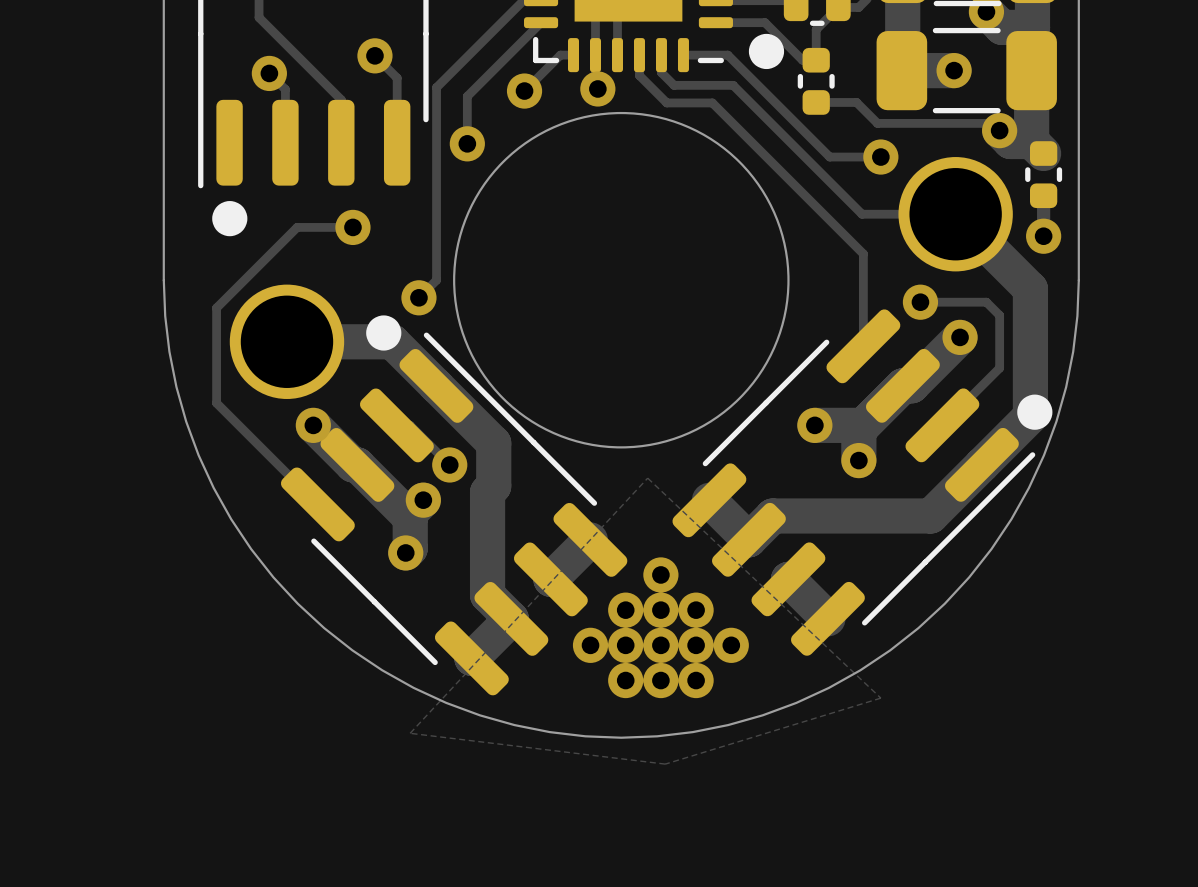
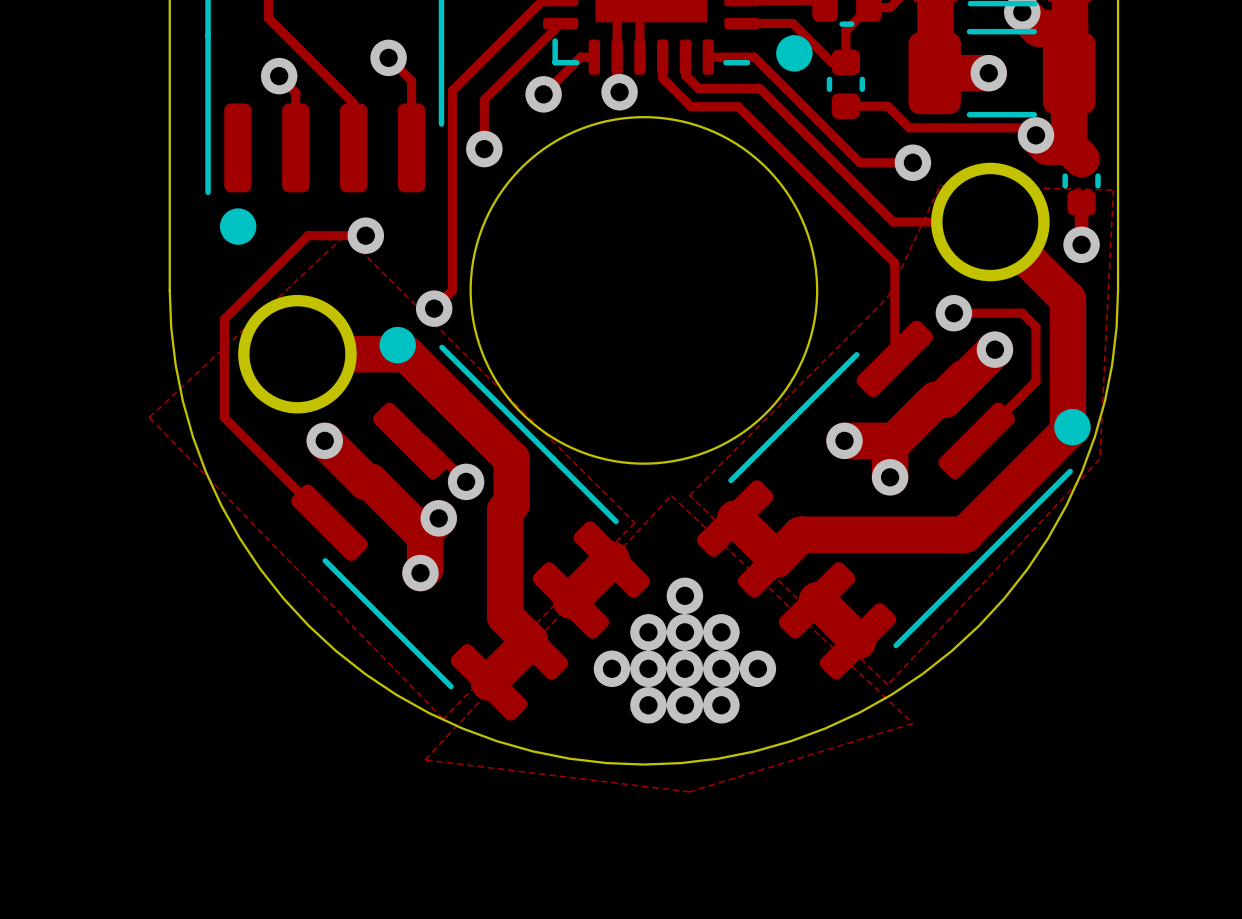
zone outline: none -> (940, 185) (887, 297) (689, 495) (887, 684) (1099, 459) (1113, 190) (940, 185)
zone outline: none -> (345, 235) (149, 417) (443, 718) (634, 522) (345, 235)

